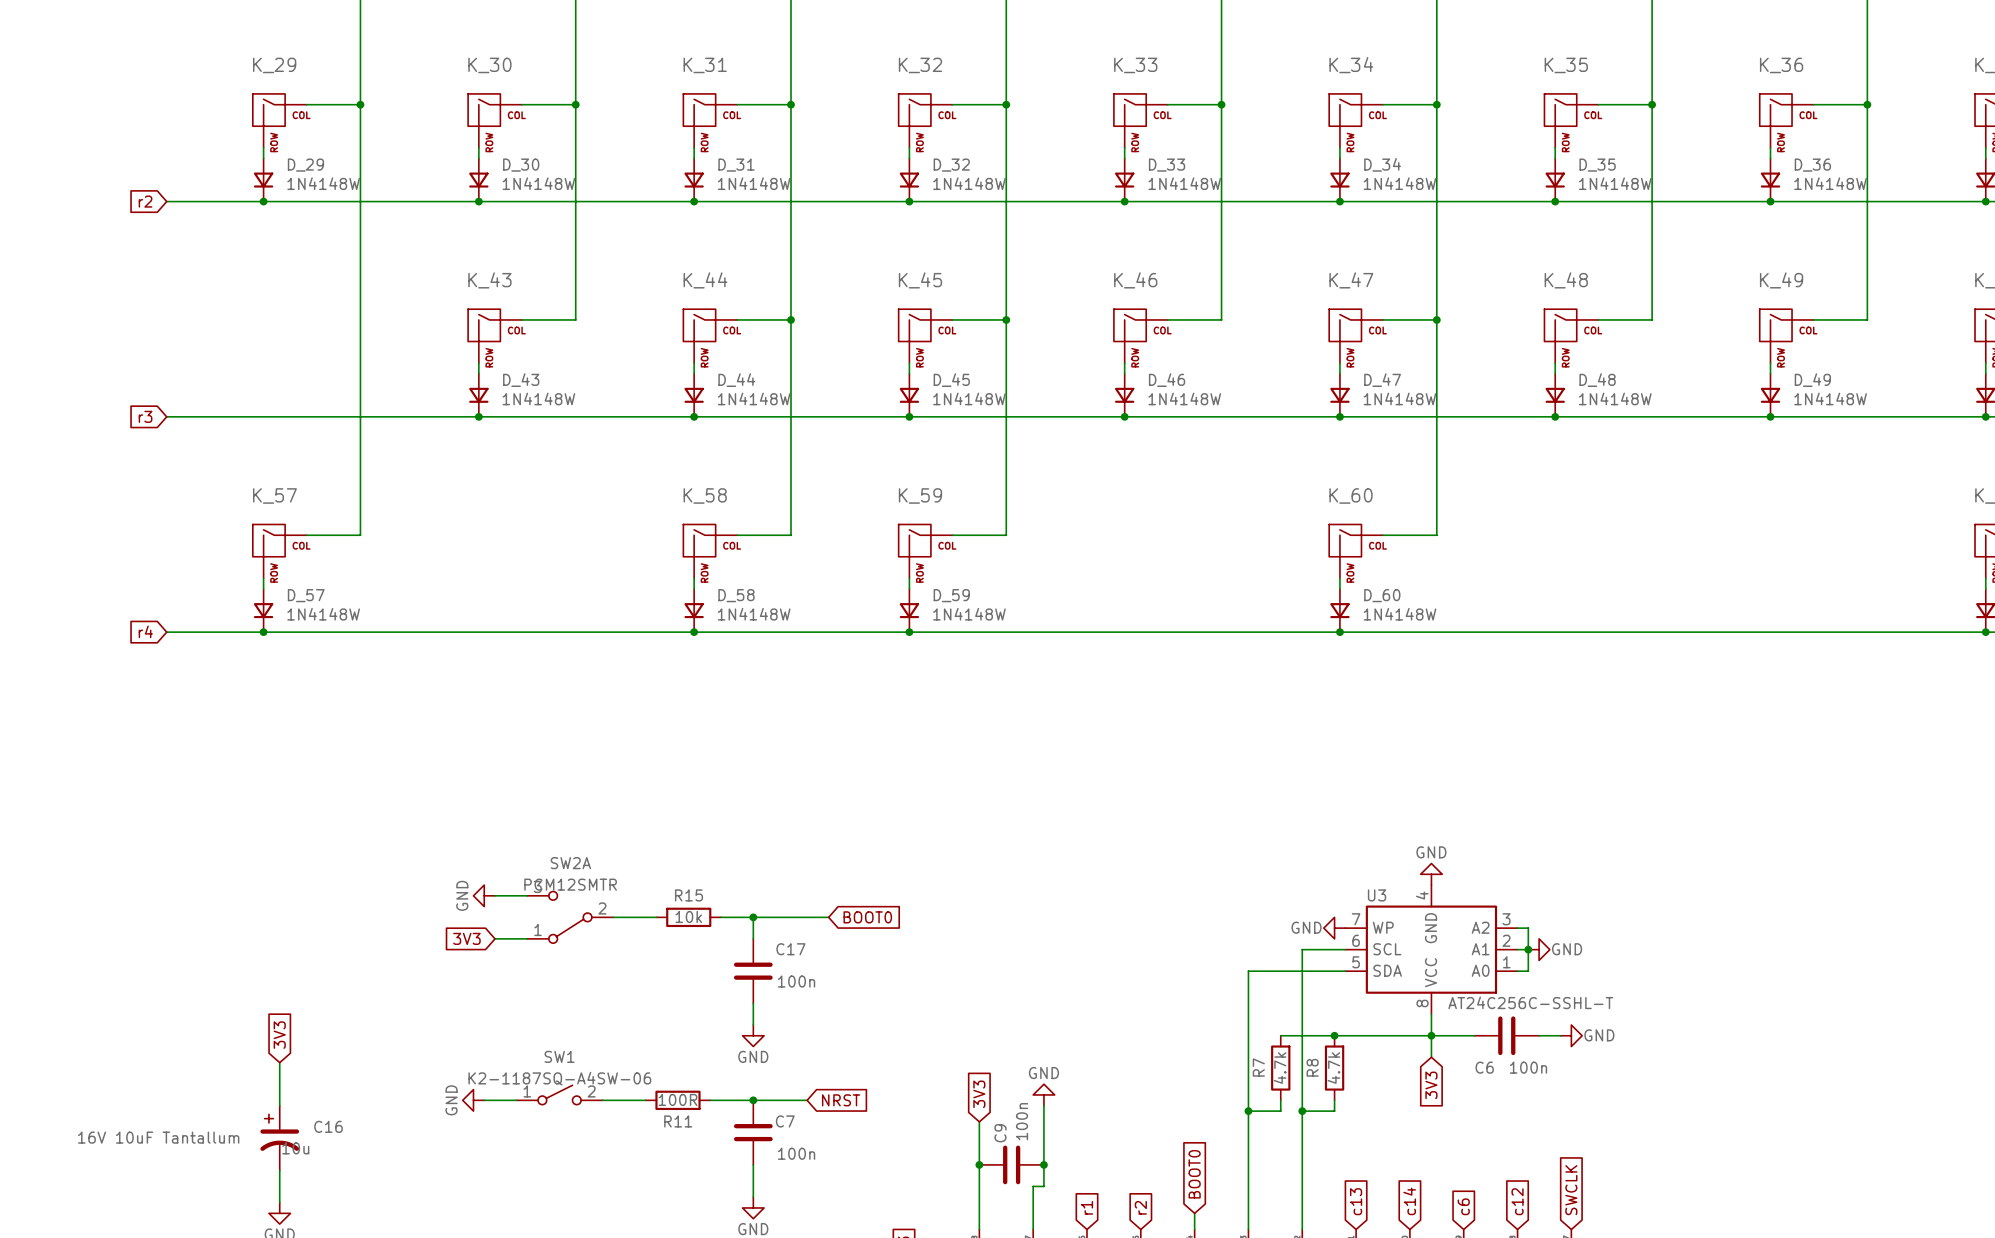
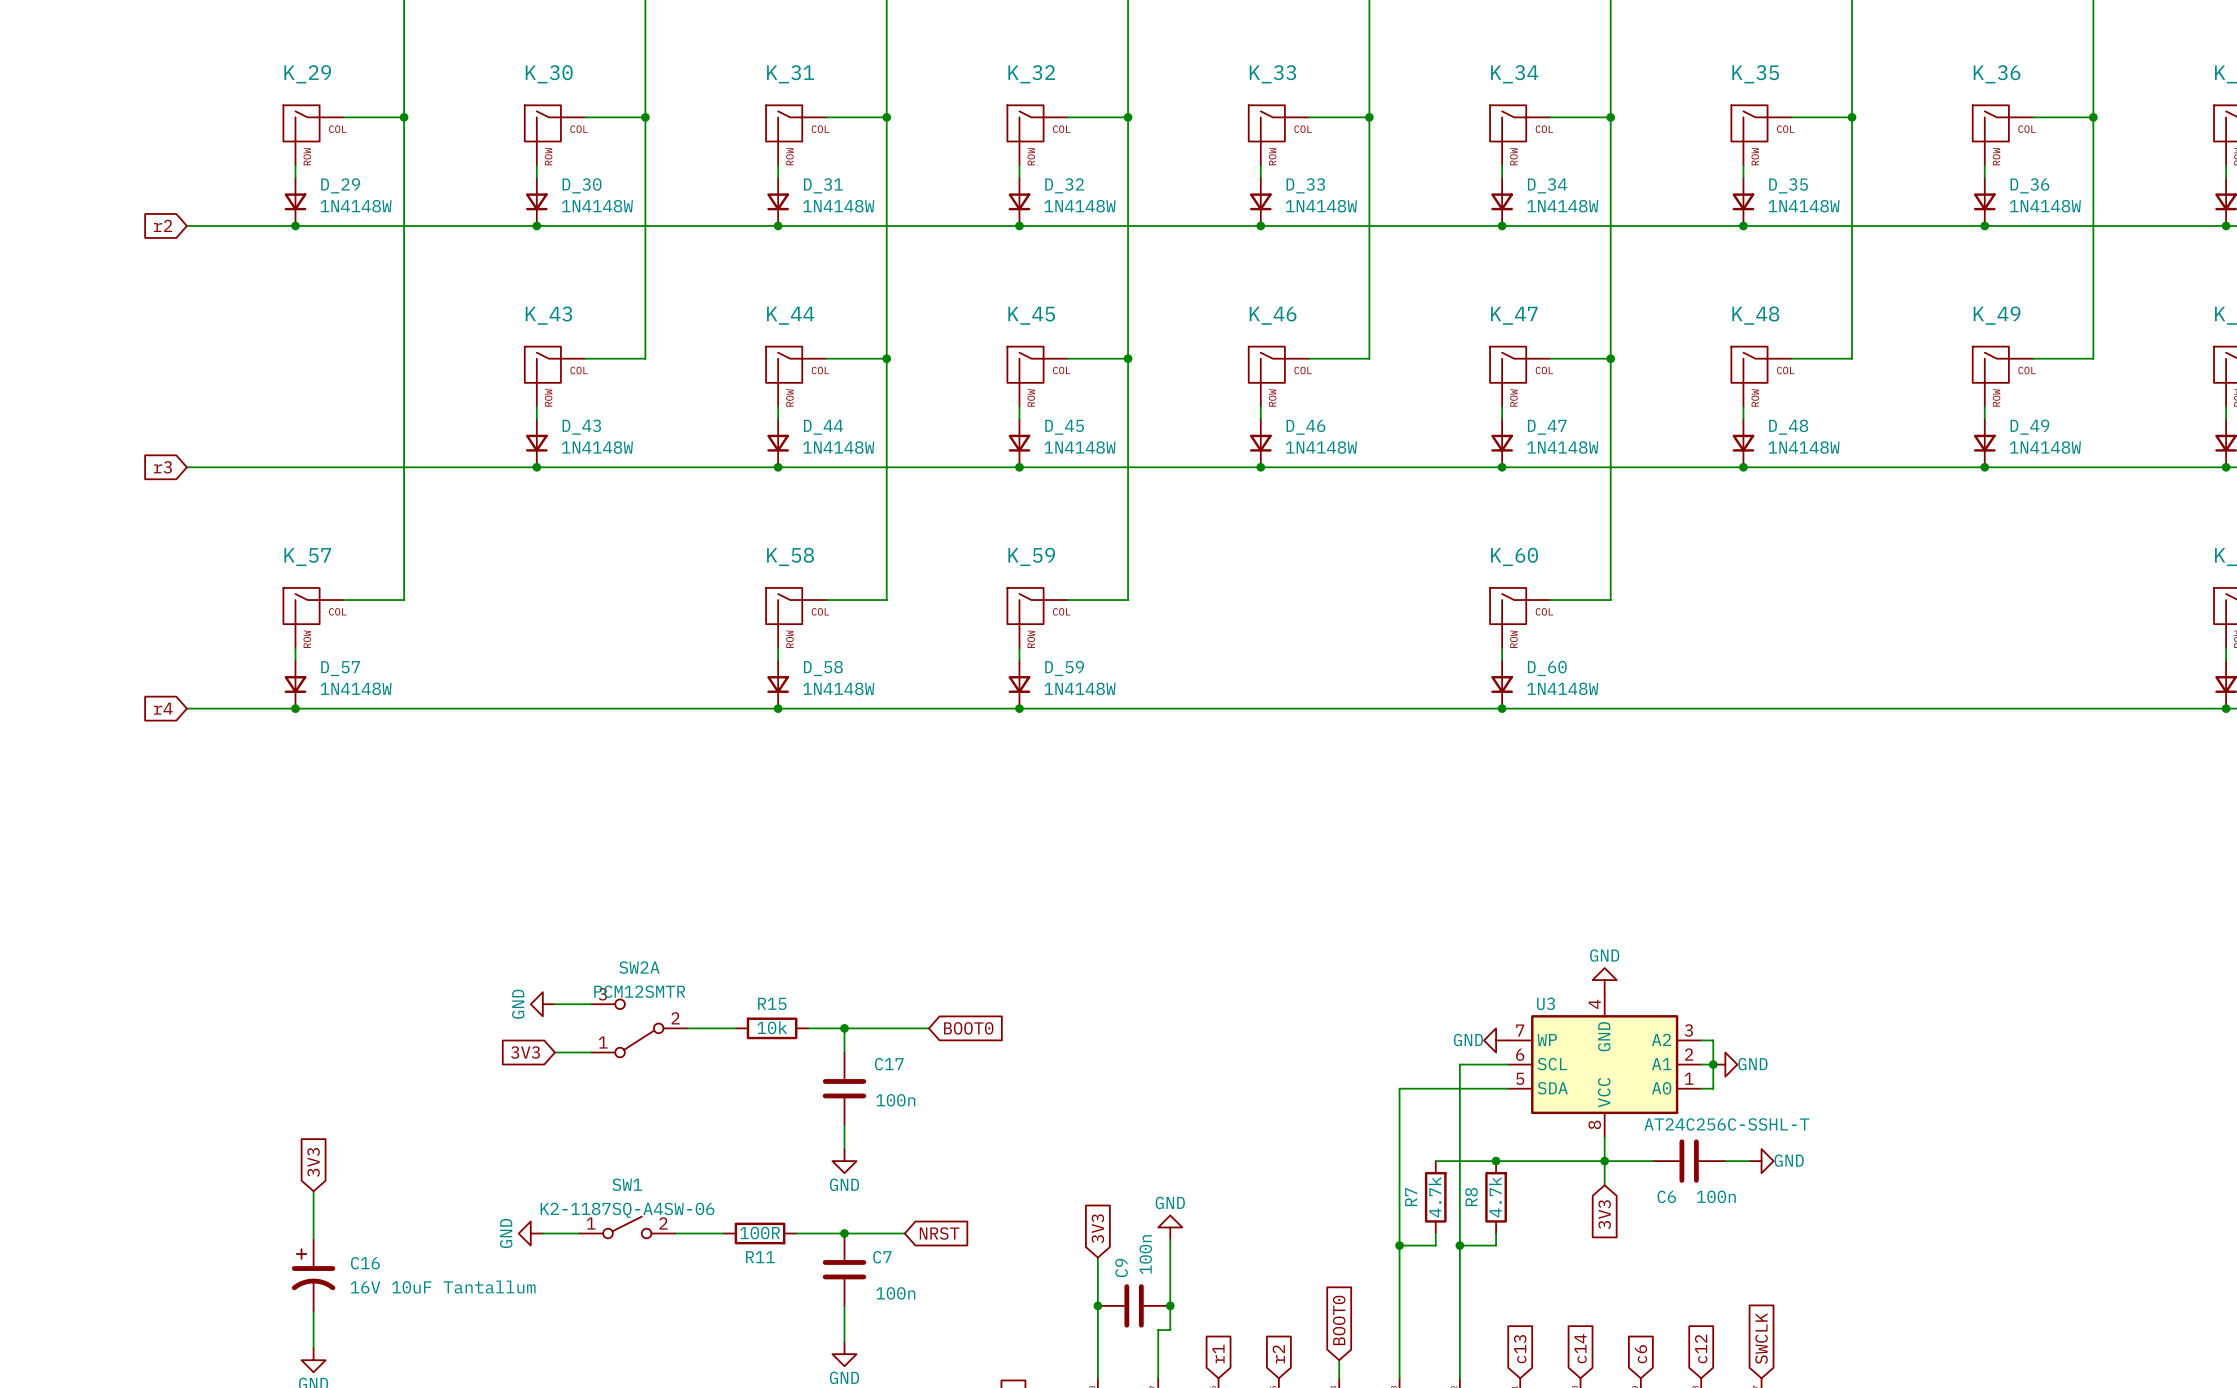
C16 text: 16V 10uF Tantallum (158, 1137) -> none
C16 value: 10u (295, 1148) -> 16V 10uF Tantallum (443, 1287)

